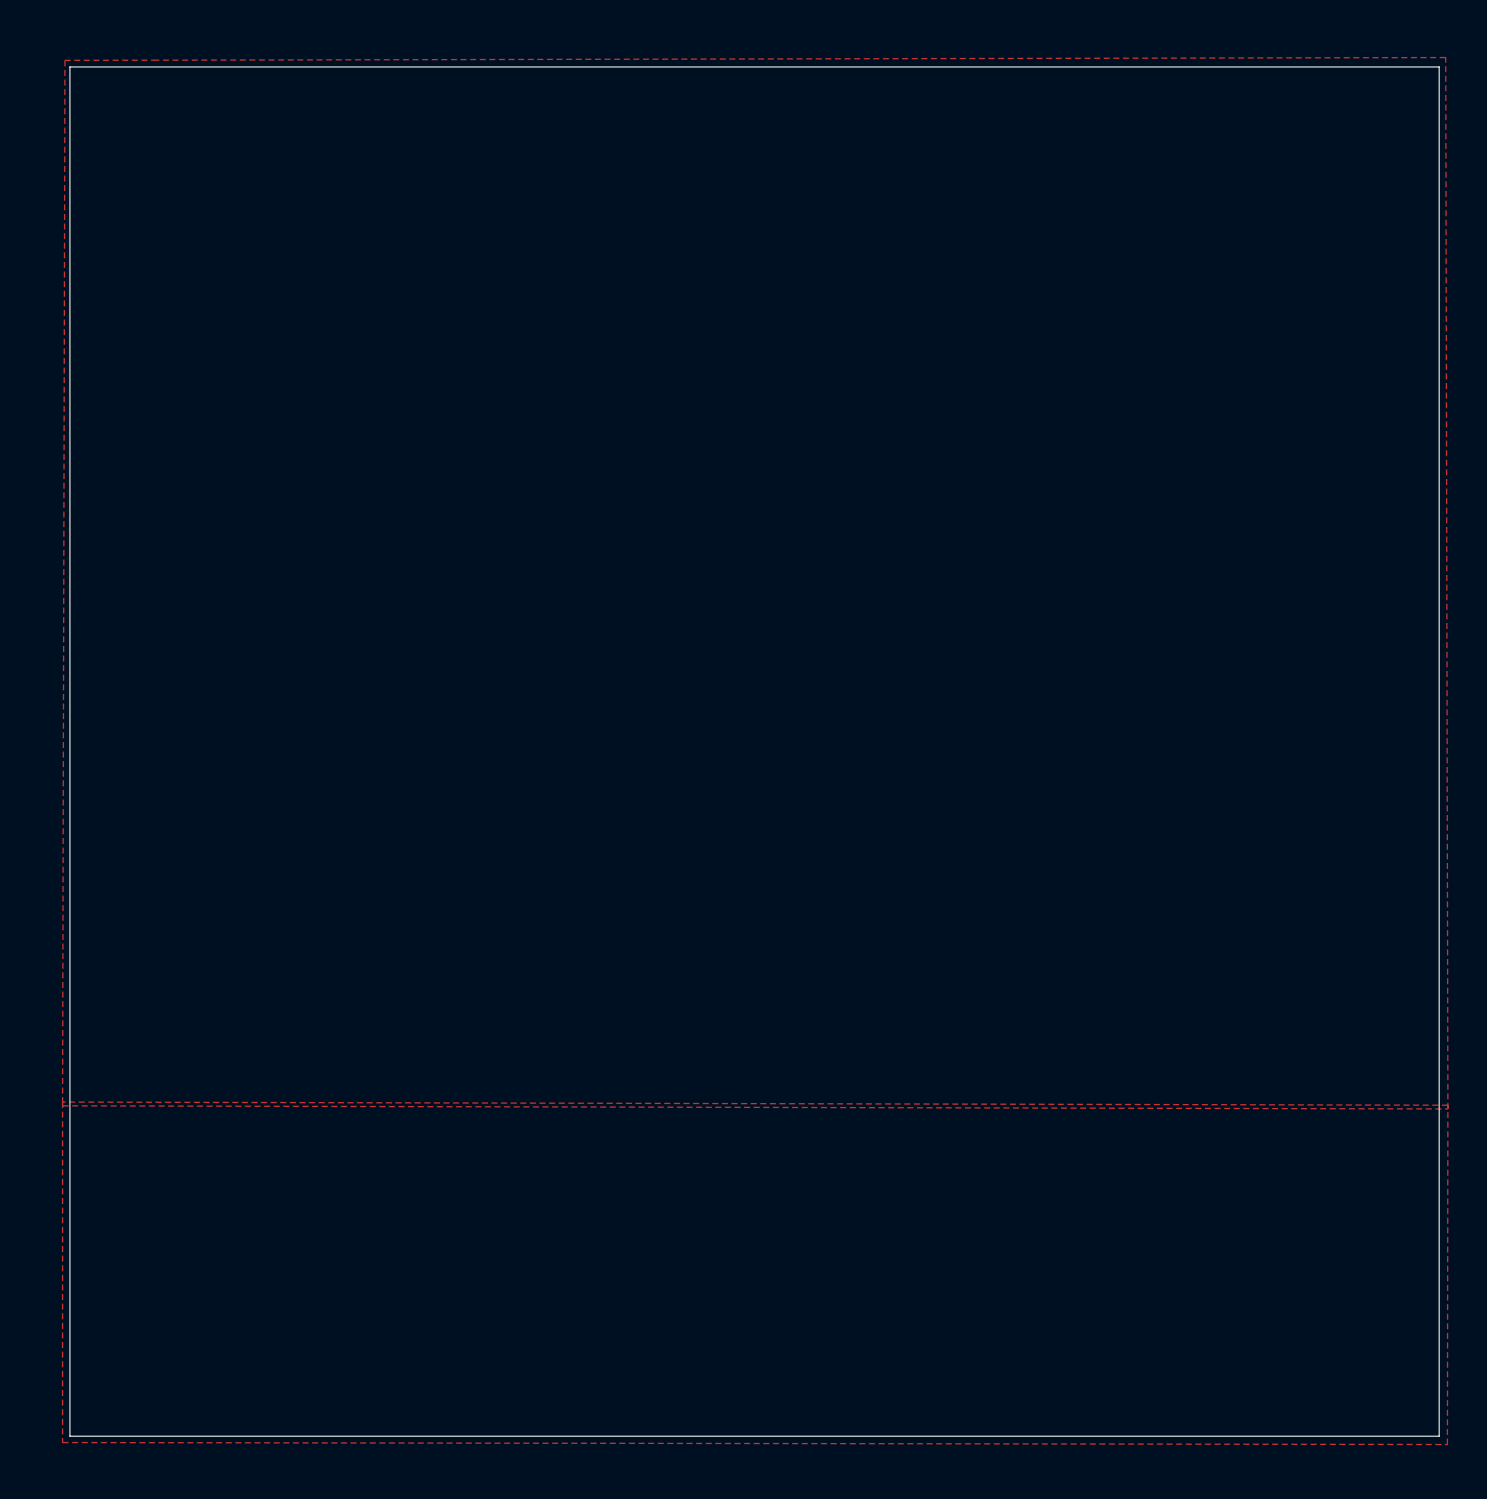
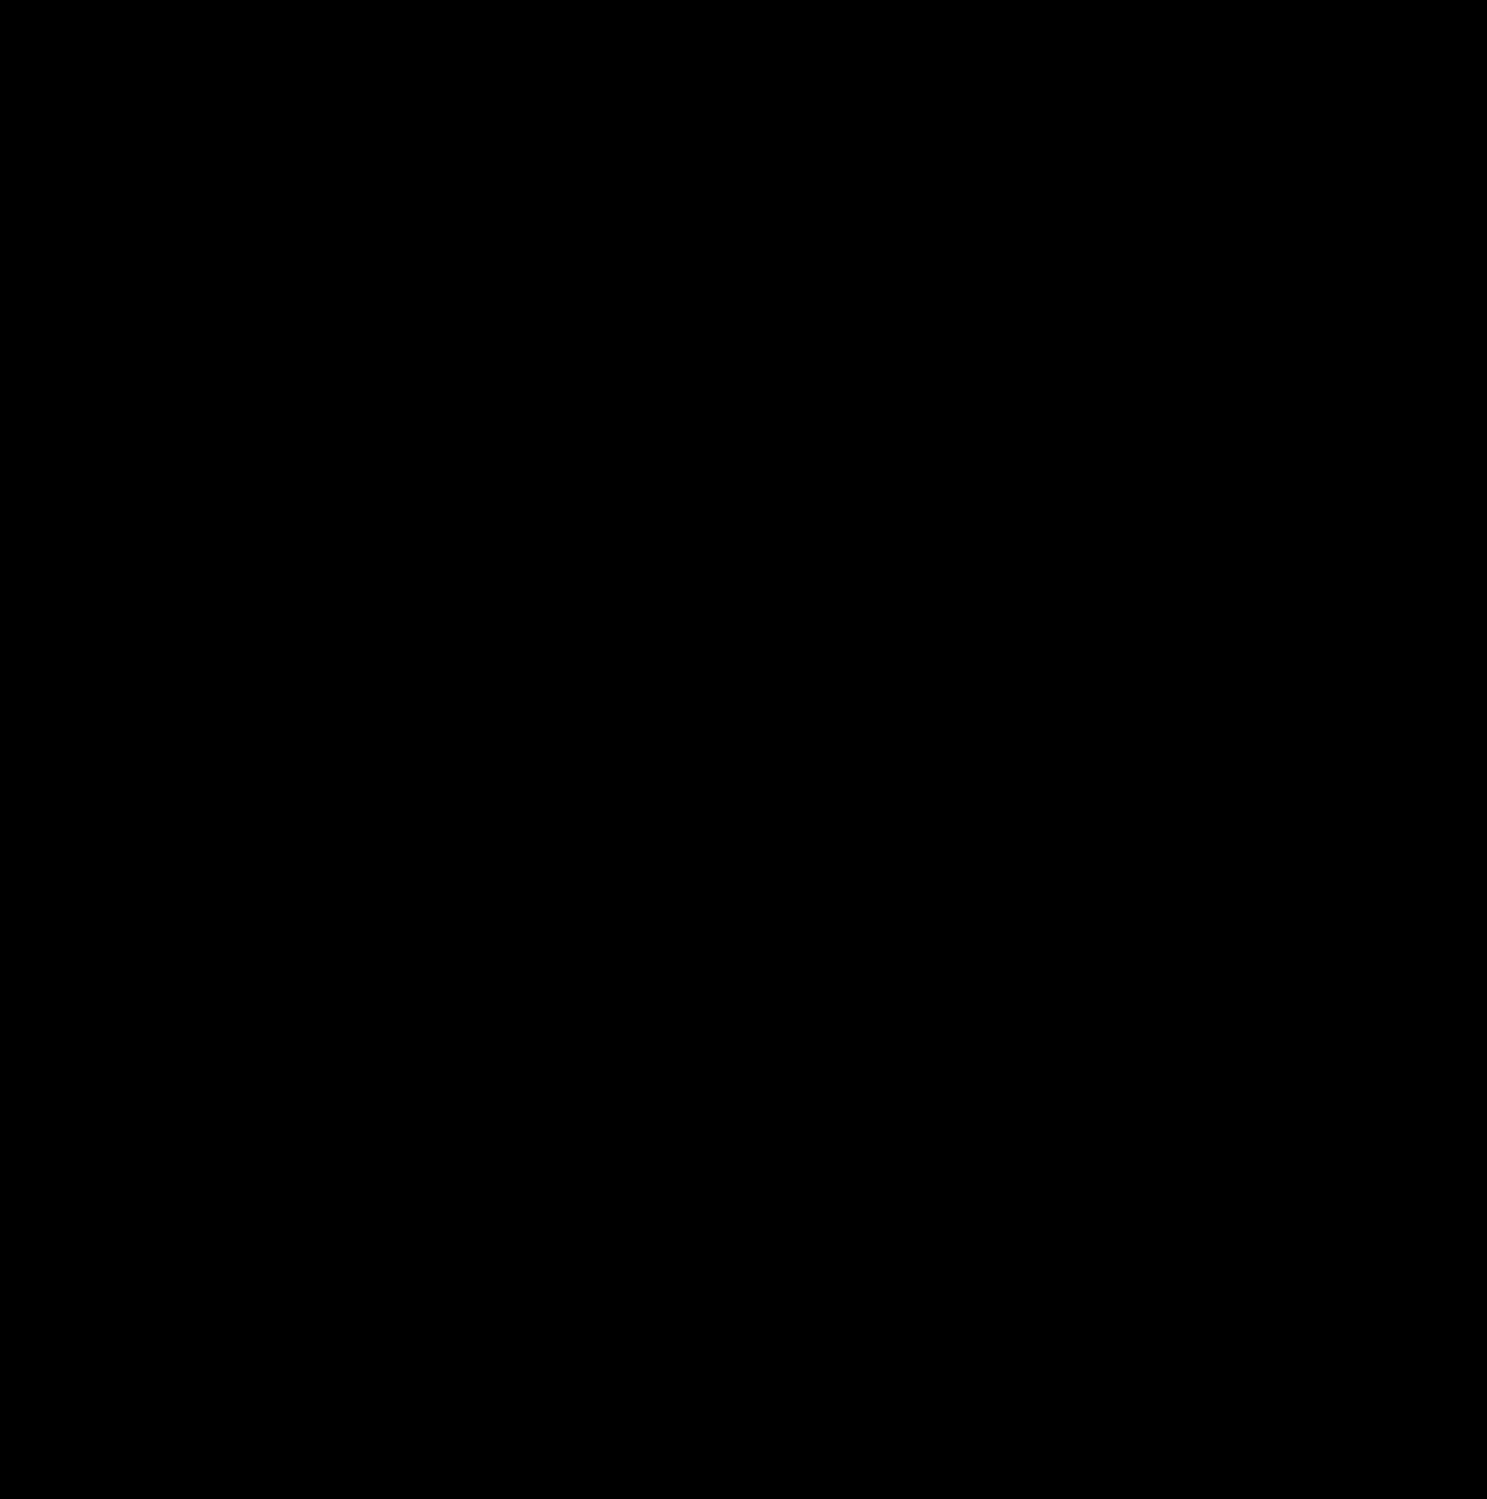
zone outline: (1445, 57) (1447, 1108) (62, 1105) (64, 60) (1445, 57) -> none
board edge: (69, 66) (1439, 66) (1439, 1436) (69, 1436) (69, 66) -> none
zone outline: (62, 1102) (62, 1442) (1447, 1444) (1447, 1105) (62, 1102) -> none

